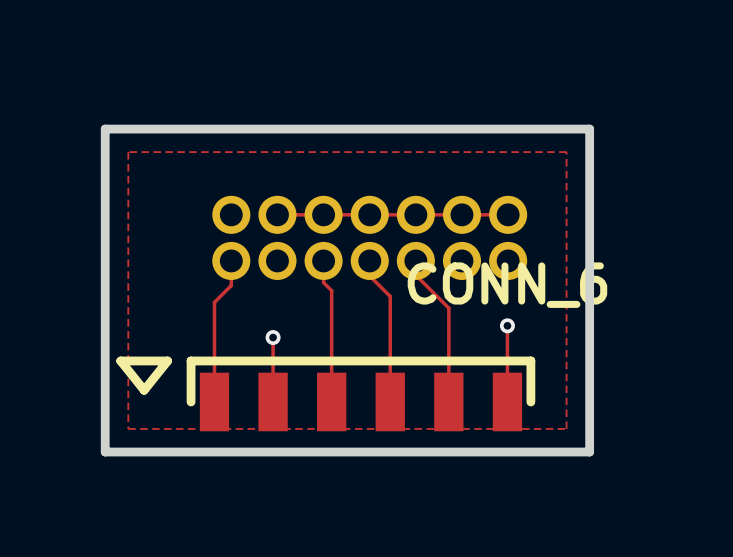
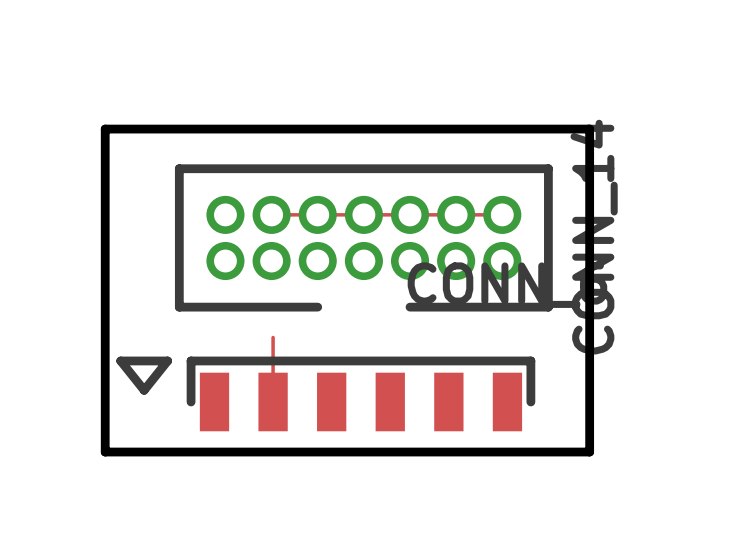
zone outline: (128, 152) (128, 428) (566, 428) (566, 152) (128, 152) -> none
part side: bottom (369, 237) -> top (363, 237)
track: (231, 260) (231, 285) (214, 302) (214, 401) -> none
track: (323, 260) (323, 282) (331, 290) (331, 401) -> none
track: (369, 260) (369, 276) (390, 296) (390, 401) -> none
track: (415, 260) (415, 275) (448, 308) (448, 401) -> none
track: (507, 325) (507, 401) -> none
via: (507, 325) -> none
via: (273, 337) -> none

